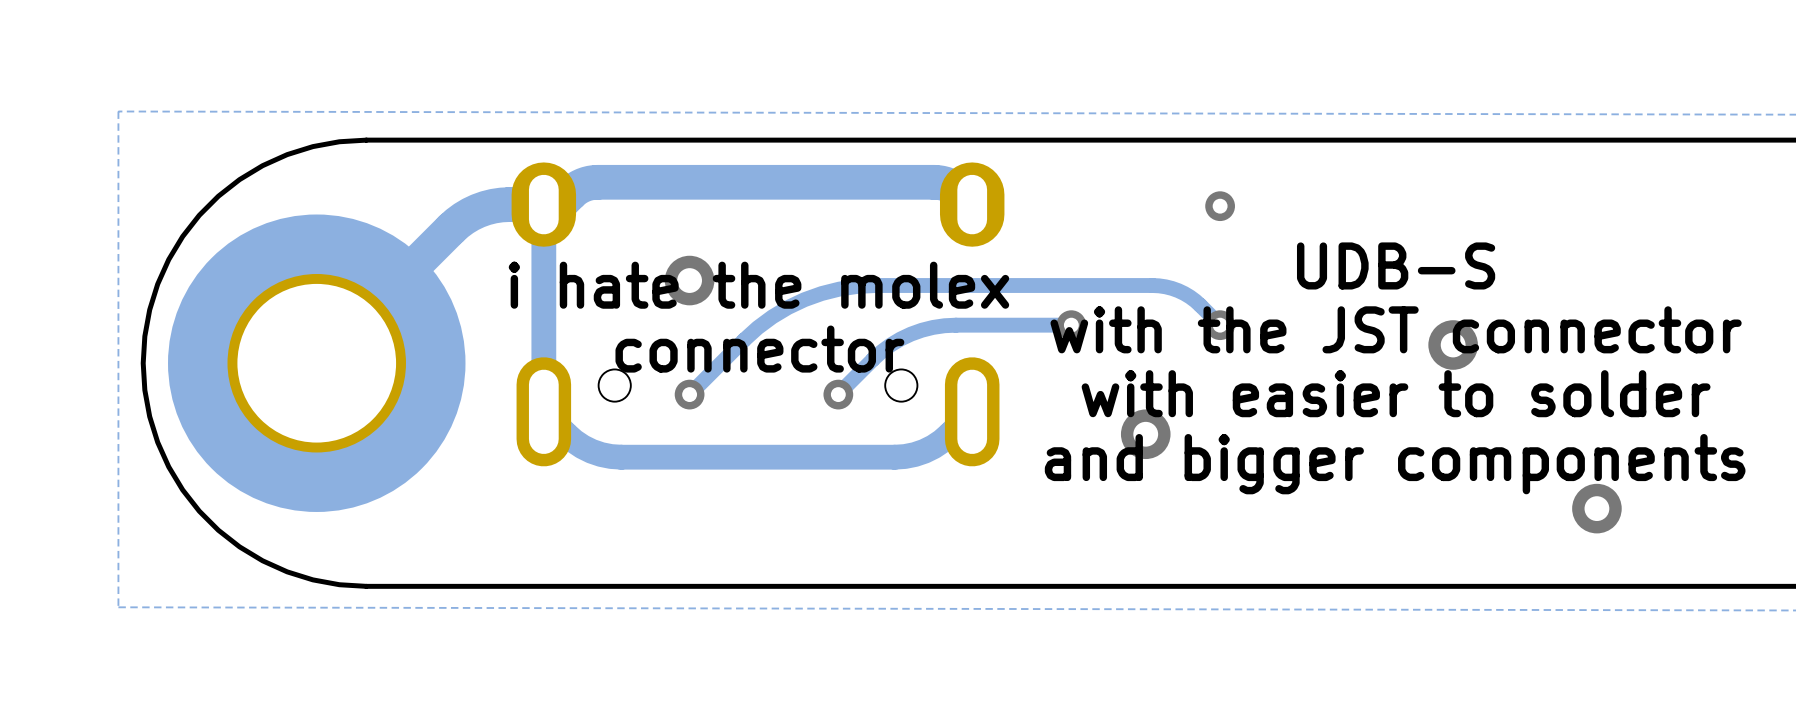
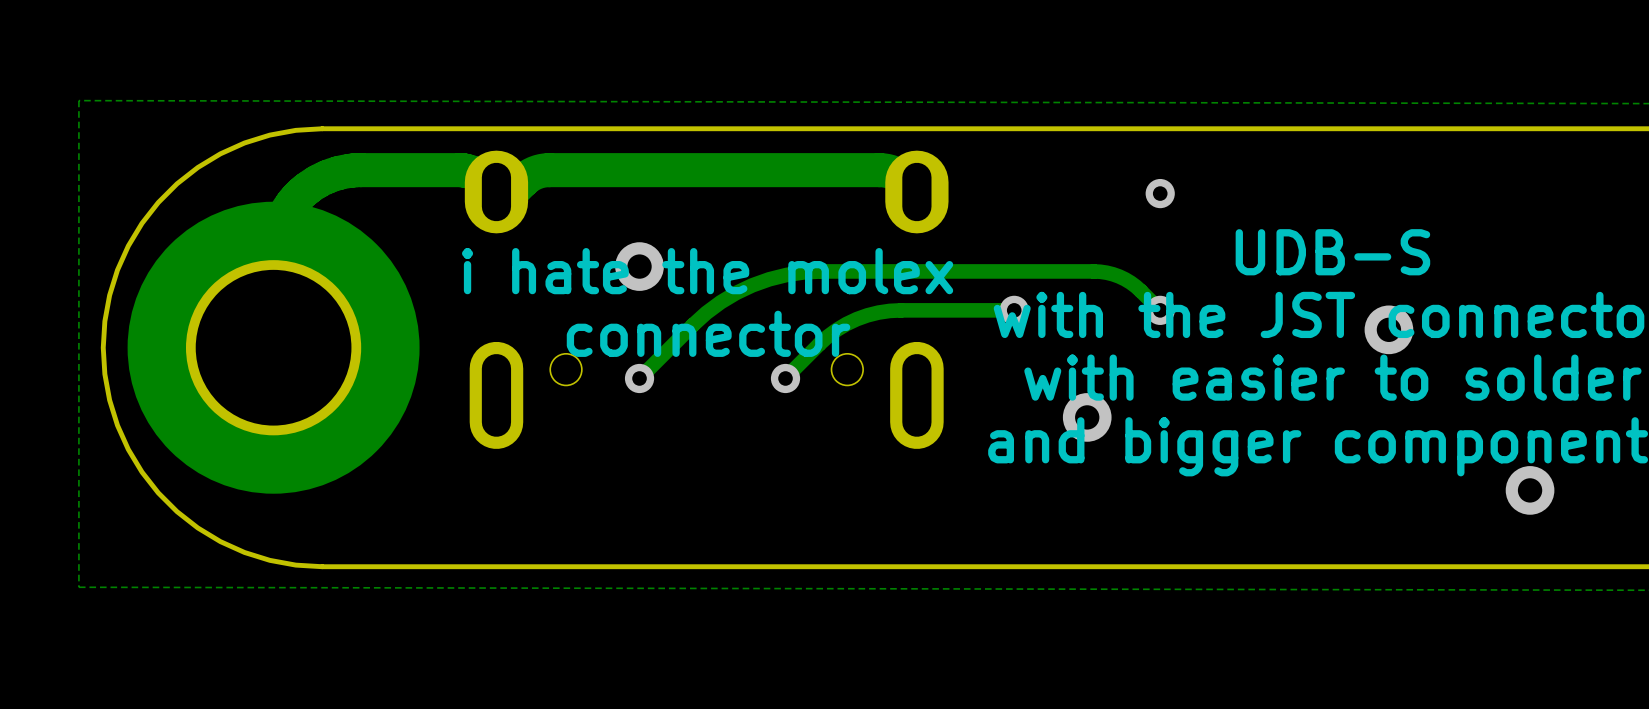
track: (316, 363) (463, 218) (478, 210) (493, 206) (543, 204) (544, 400) (546, 410) (555, 423) (574, 441) (591, 451) (621, 457) (904, 456) (933, 446) (949, 434) (972, 411) -> (273, 347) (275, 240) (285, 213) (305, 189) (327, 176) (355, 170) (462, 170) (476, 174) (485, 181)

